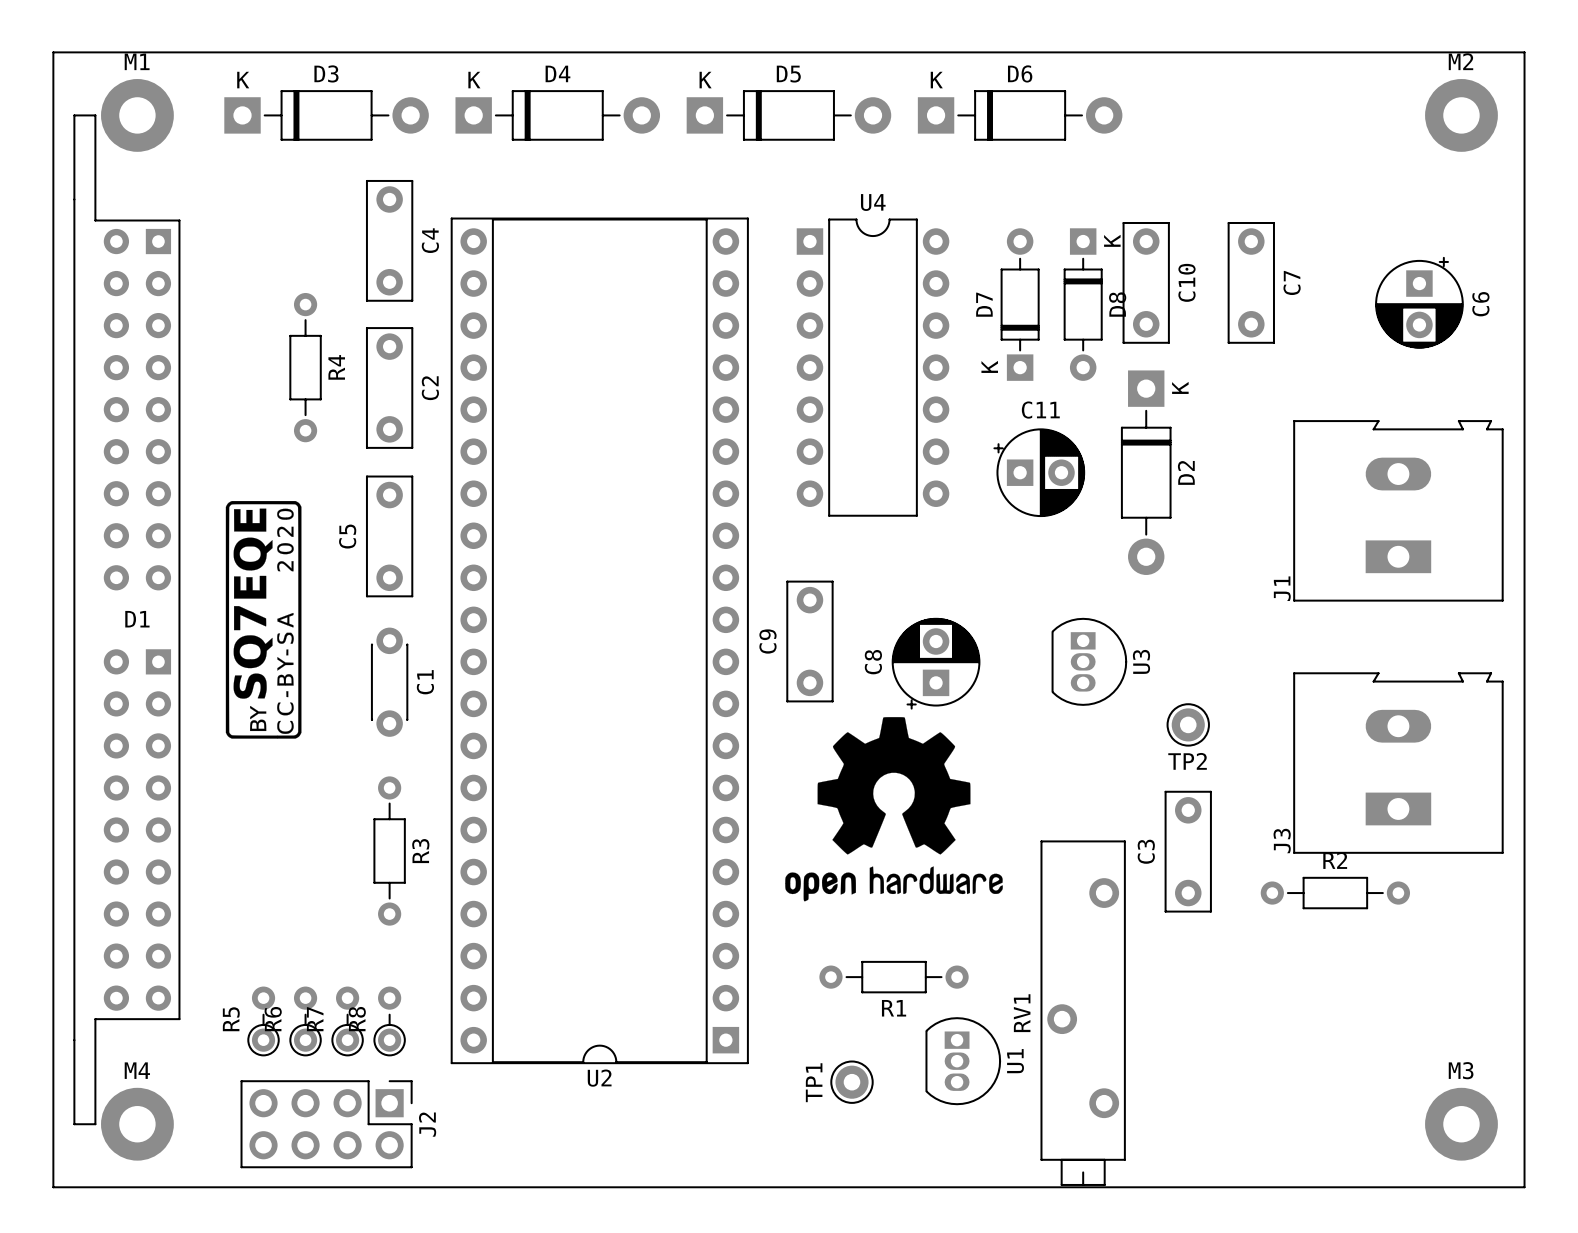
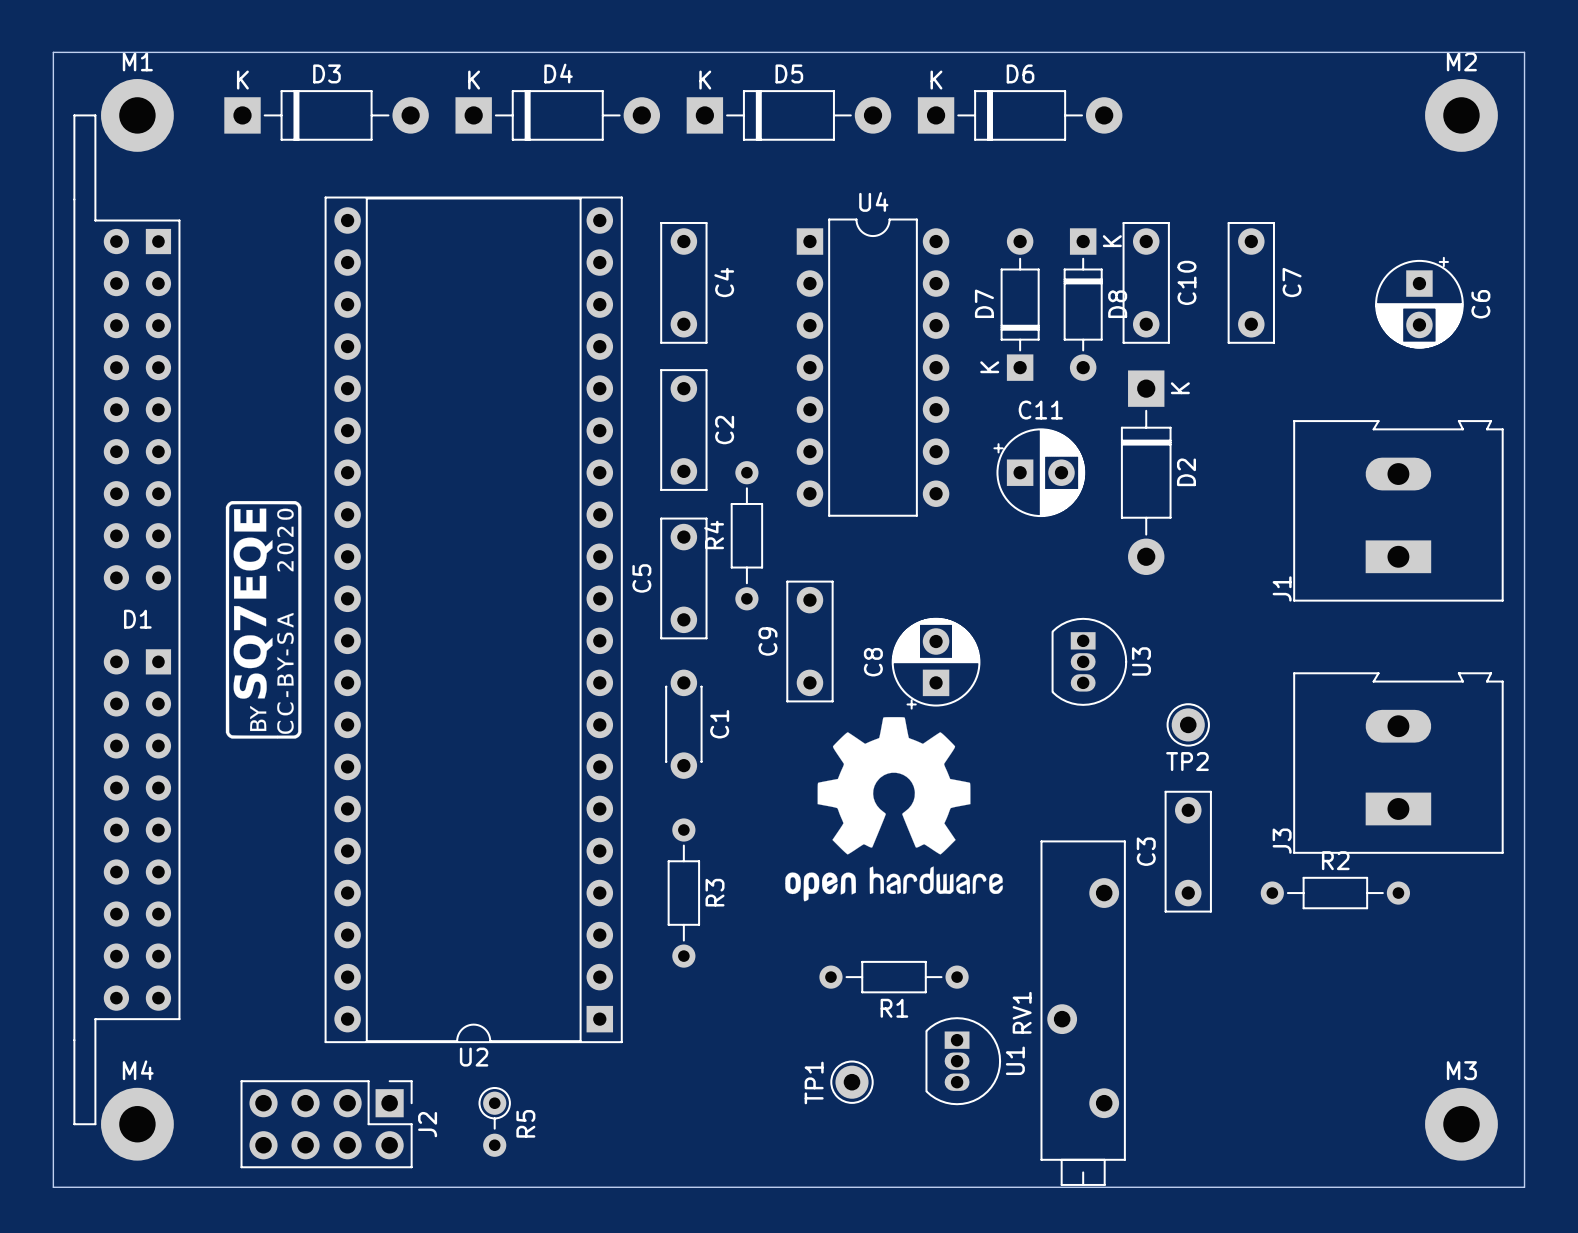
C4 position: (389, 240) -> (683, 282)
R4 position: (305, 367) -> (746, 535)
R4 name position: R4 (336, 367) -> R4 (714, 534)
C2 position: (389, 387) -> (683, 430)
C5 position: (389, 536) -> (683, 578)
U2 position: (599, 640) -> (473, 619)
C1 position: (389, 682) -> (683, 724)
R3 position: (389, 851) -> (683, 893)
R5 rotation: 0° (263, 1021) -> 180° (494, 1121)
R5 position: (263, 1021) -> (494, 1121)
R6: (305, 1021) -> none
R7: (347, 1021) -> none
R8: (389, 1021) -> none

